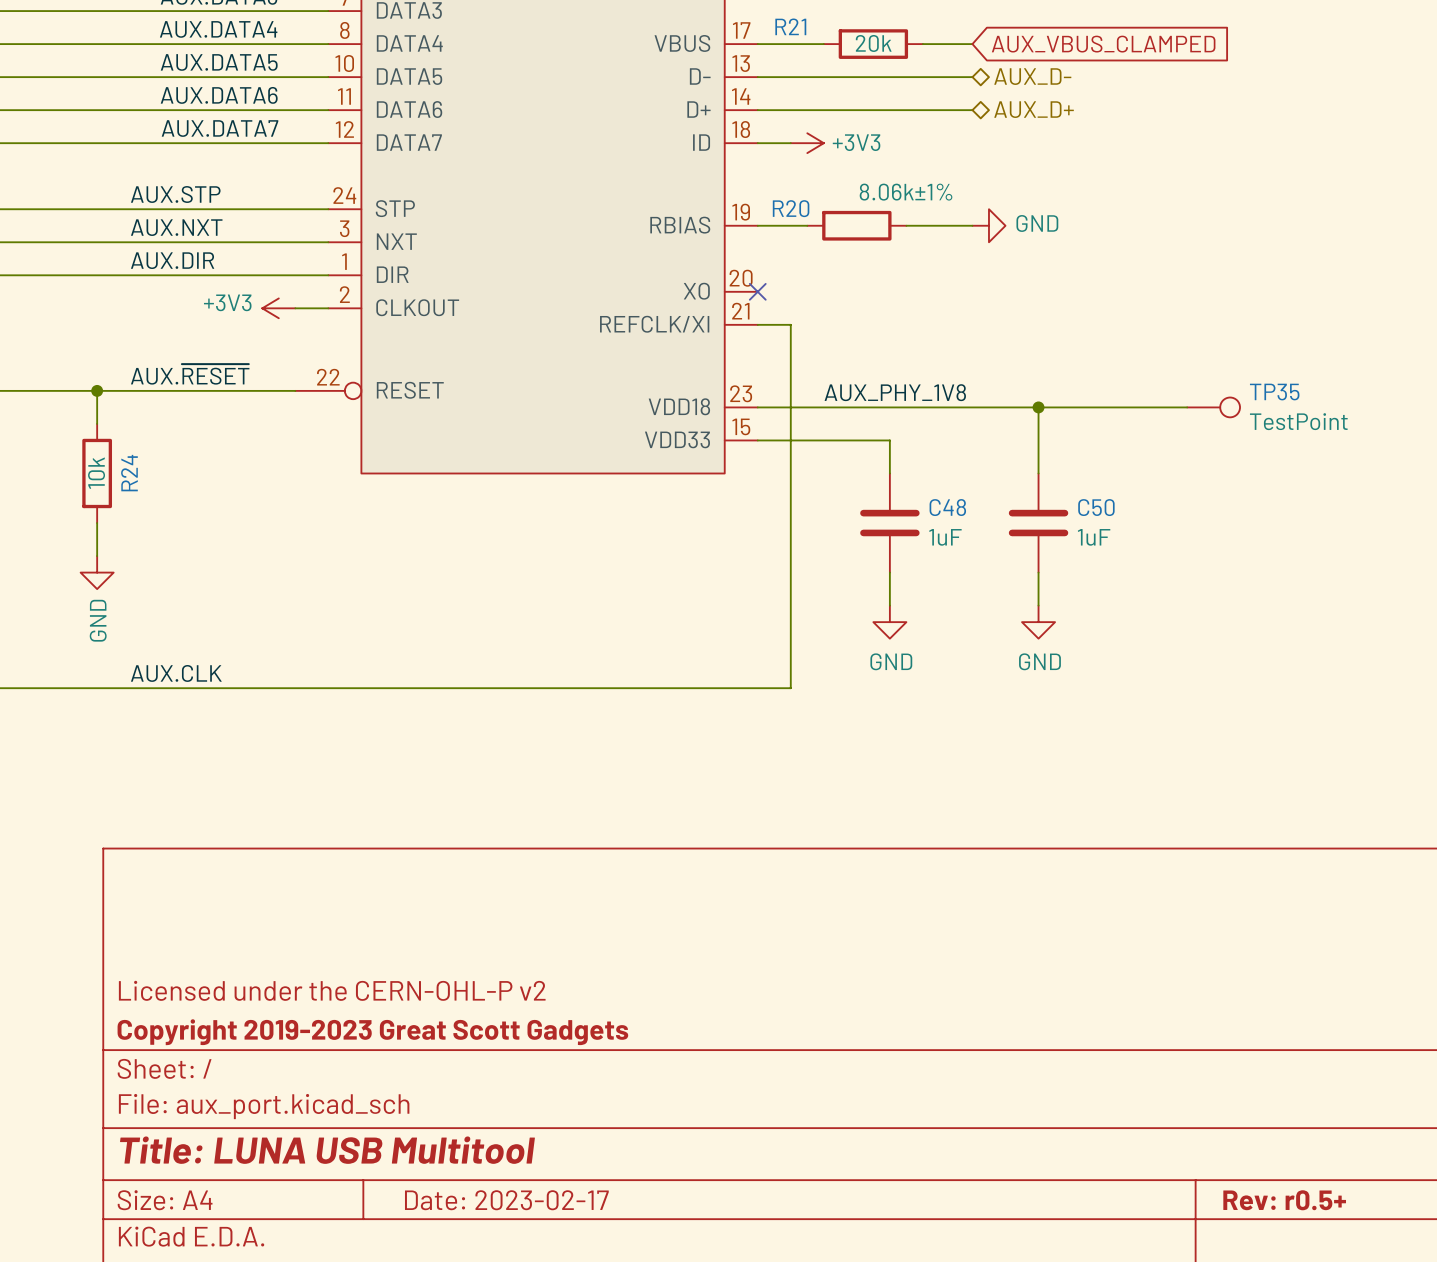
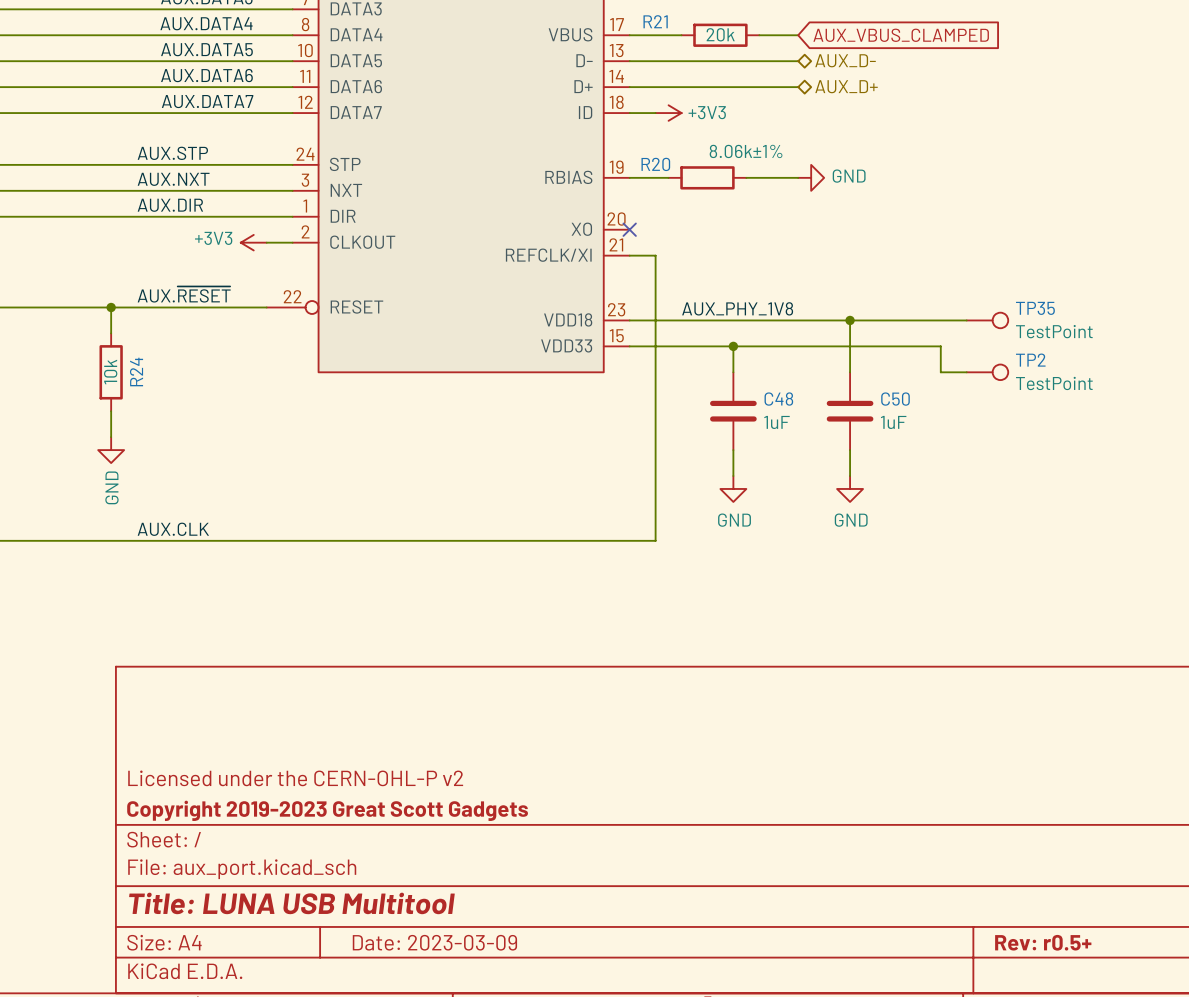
wire: none -> (733, 346) (940, 346) (940, 372) (966, 372)
junction: none -> (733, 346)
TP2: none -> TestPoint (987, 372)
title block: Date: 2023-02-17 (506, 1200) -> Date: 2023-03-09 (434, 942)

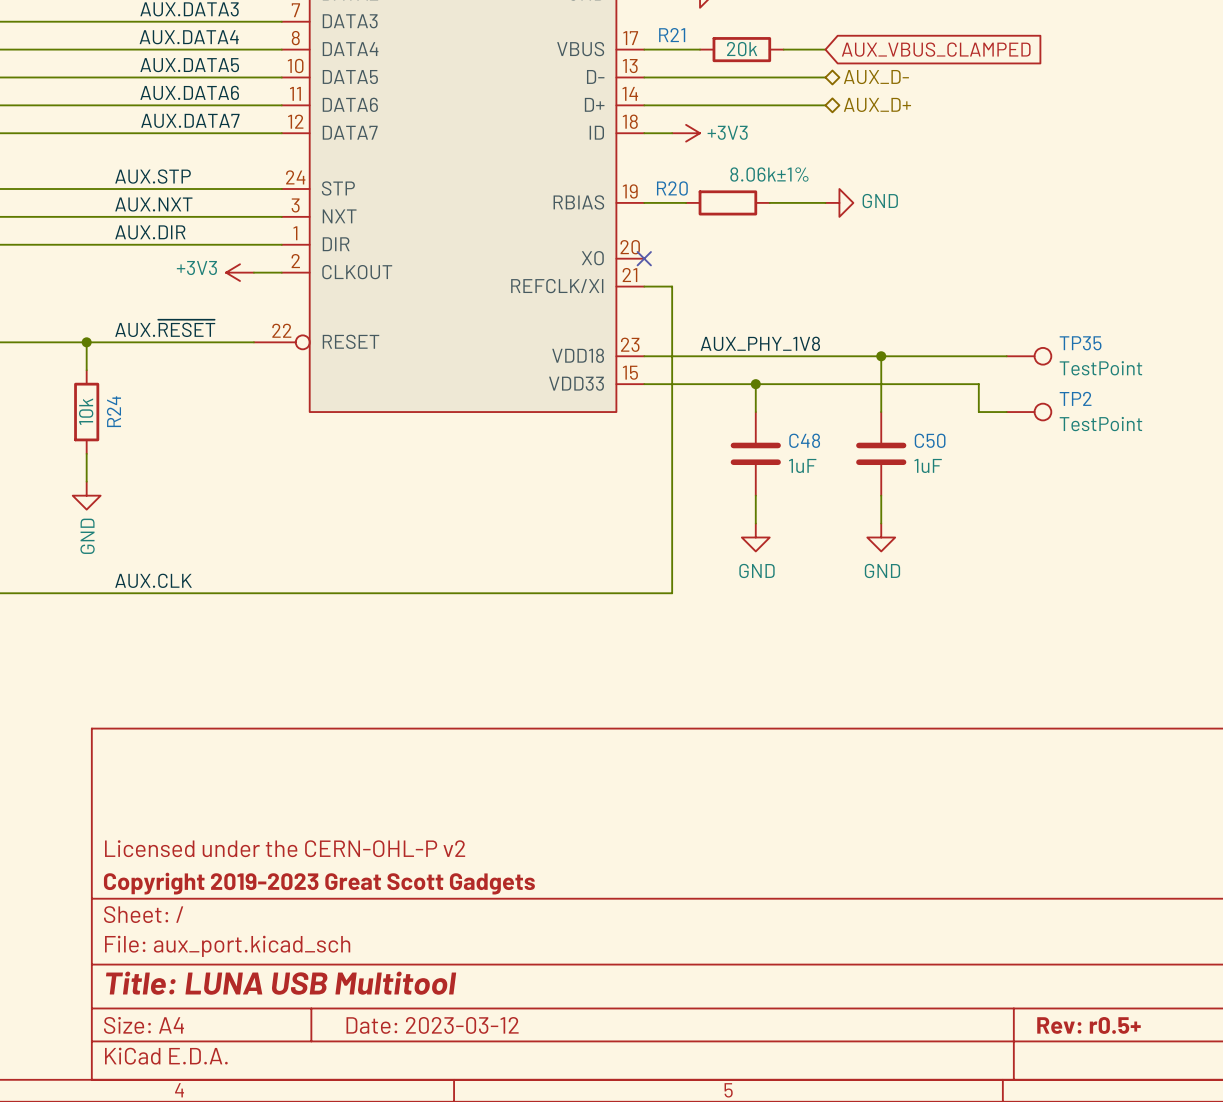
title block: Date: 2023-03-09 (434, 942) -> Date: 2023-03-12 (432, 1025)

